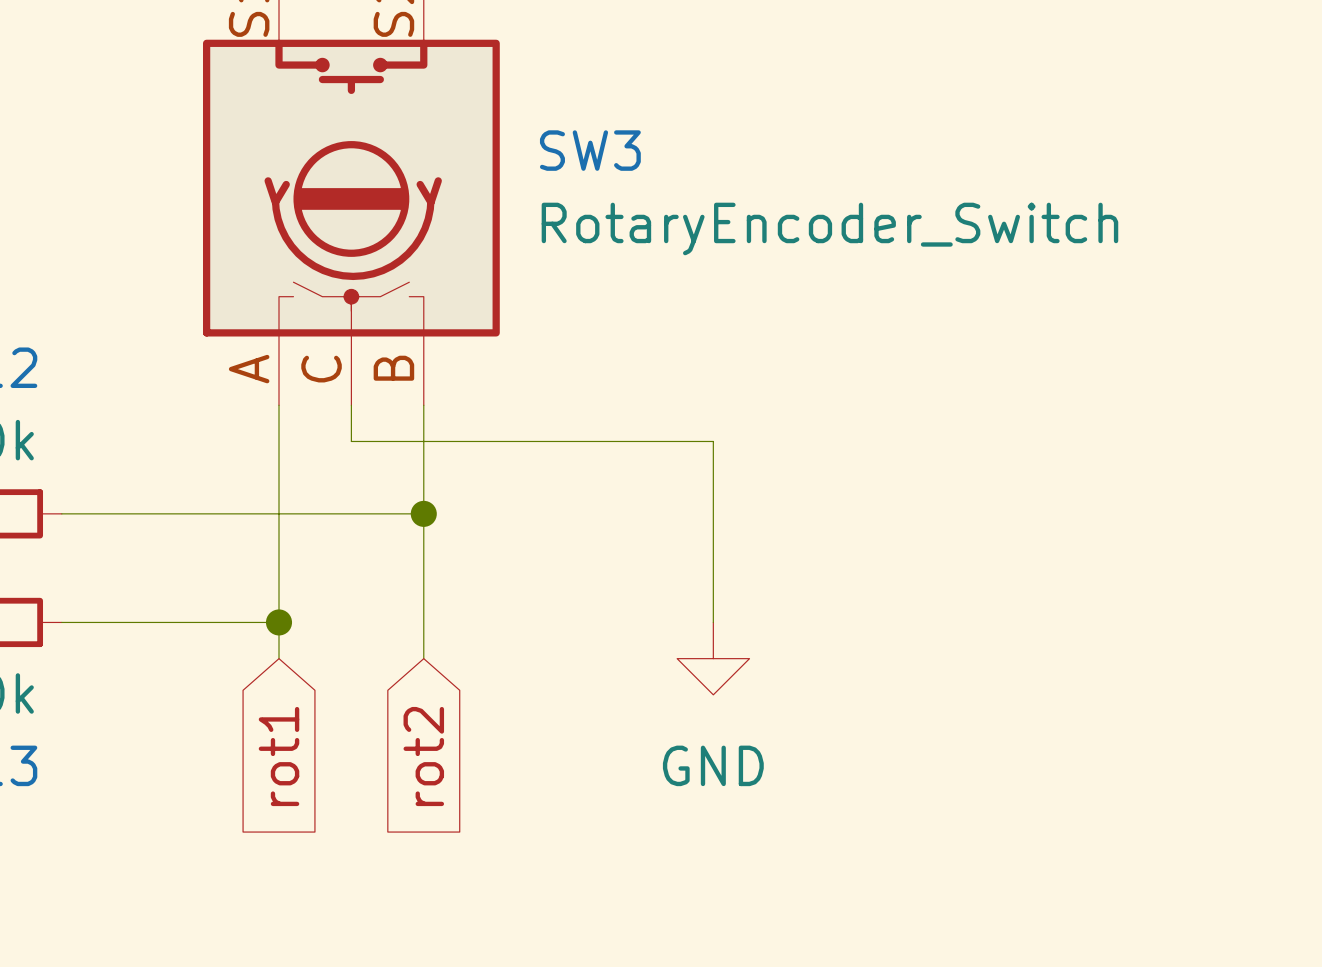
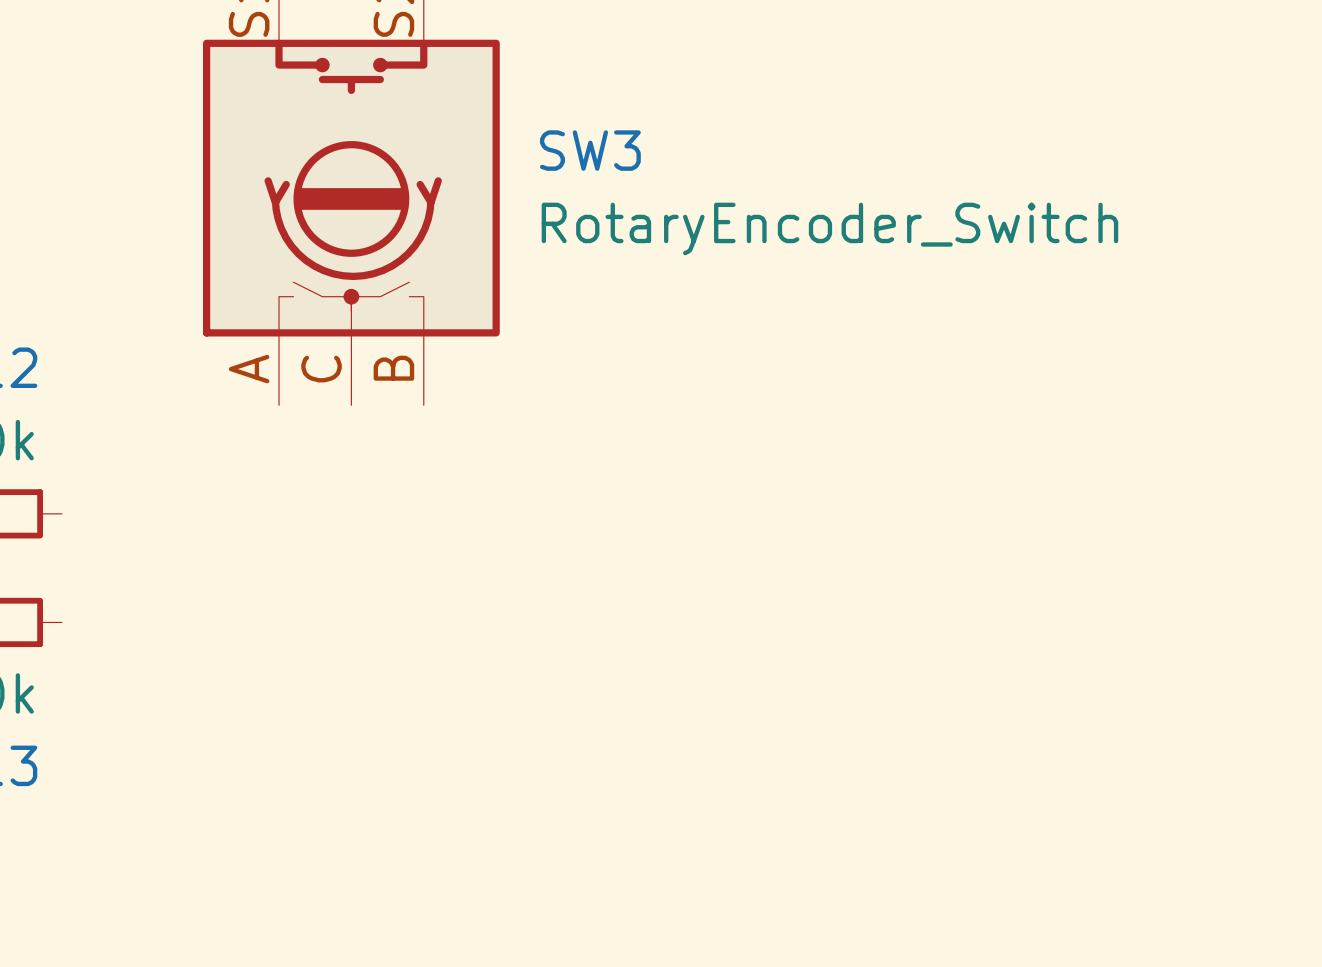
wire: (279, 405) (279, 658) -> none
wire: (351, 405) (351, 441) (713, 441) (713, 622) -> none
wire: (423, 405) (423, 658) -> none
wire: (61, 513) (423, 513) -> none
junction: (423, 513) -> none
wire: (61, 622) (279, 622) -> none
junction: (279, 622) -> none
power symbol: GND (713, 658) -> none
global label: rot1 (279, 756) -> none
global label: rot2 (423, 756) -> none

